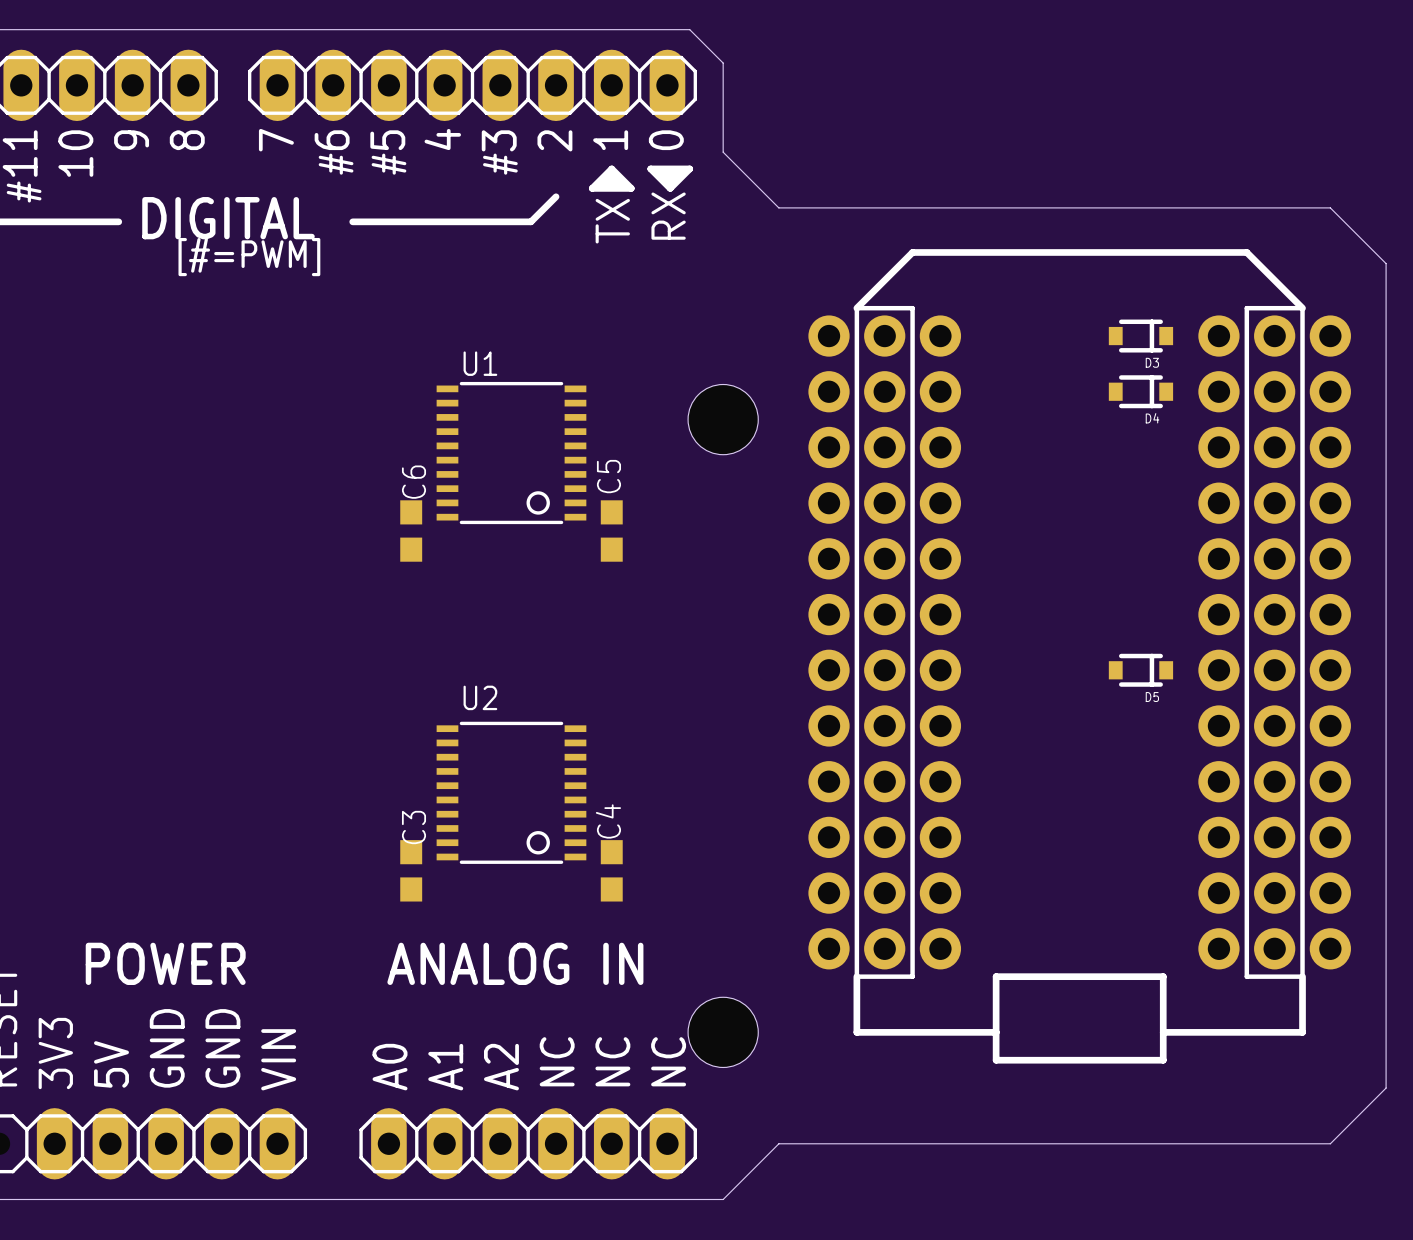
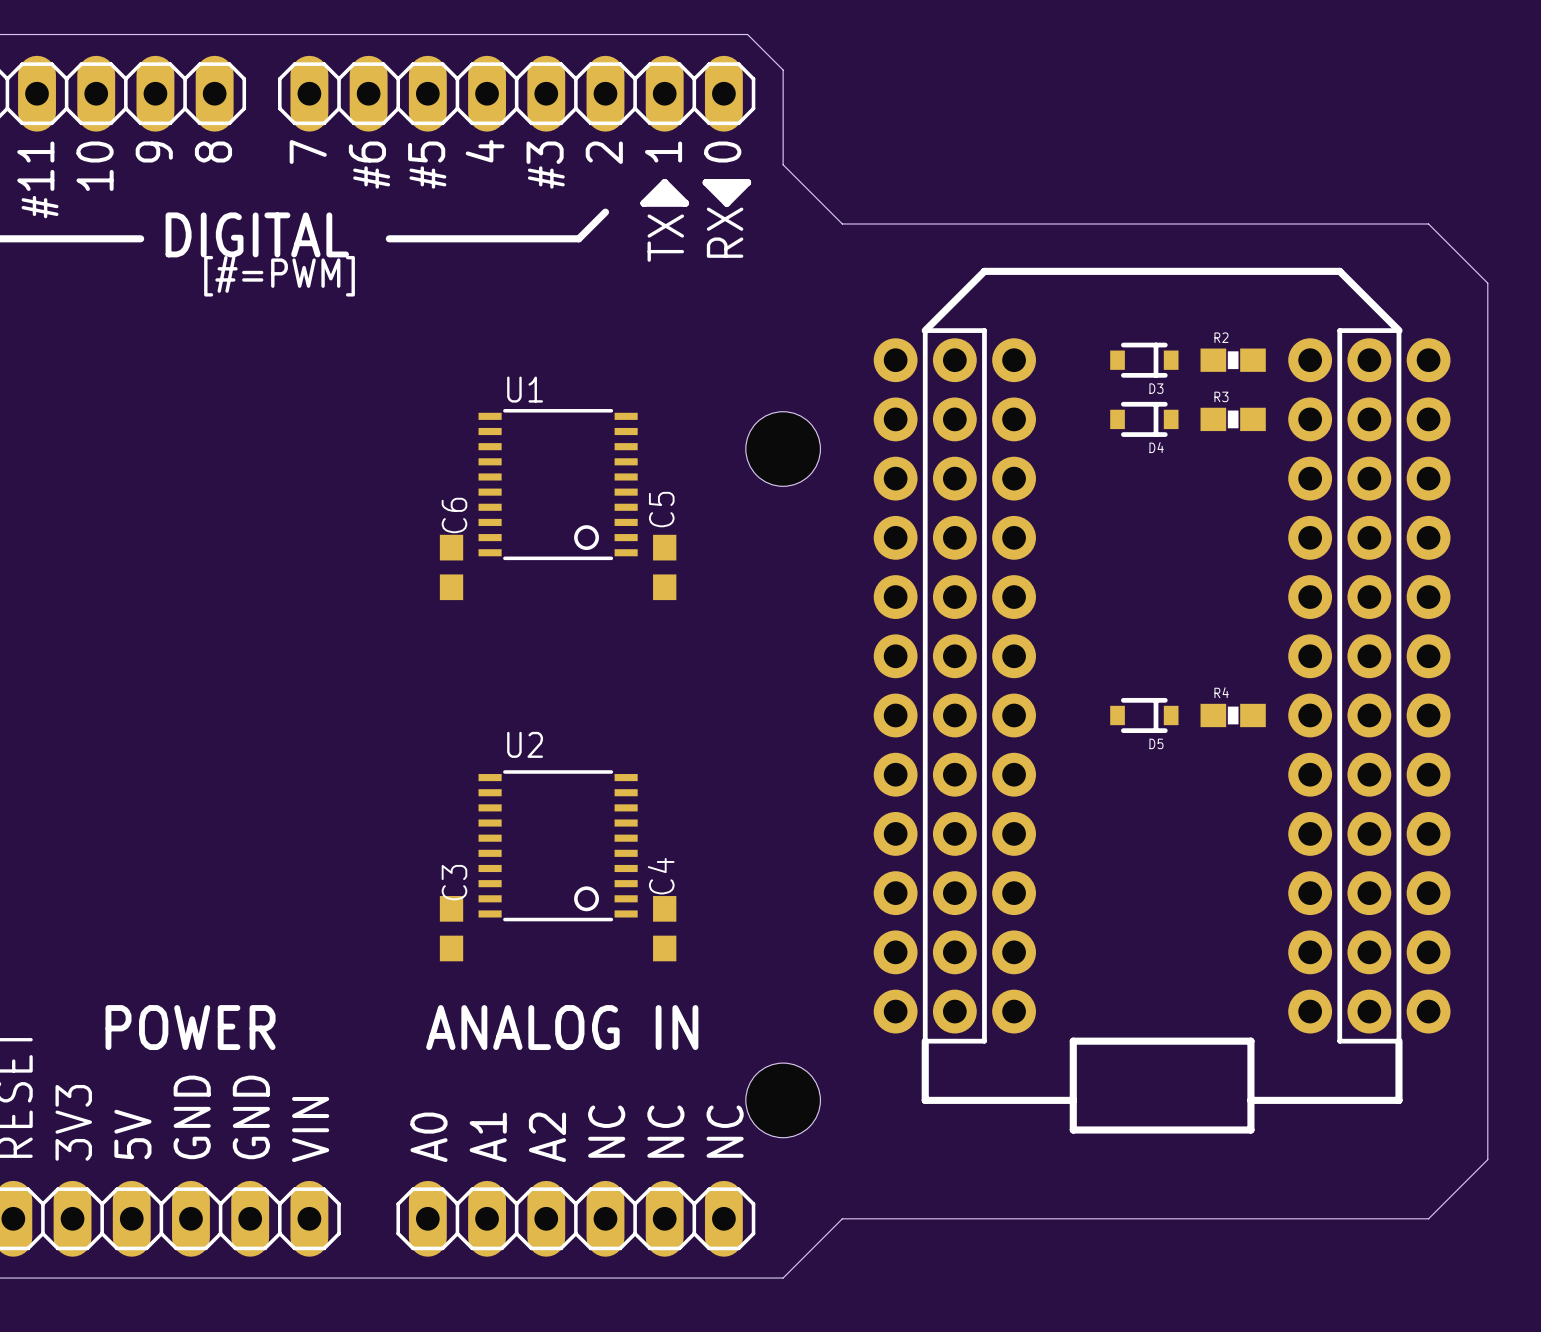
D3 position: (1140, 336) -> (1144, 360)
R2: none -> (1233, 360)
D4 position: (1140, 391) -> (1144, 419)
R3: none -> (1233, 419)
D5 position: (1140, 670) -> (1144, 715)
R4: none -> (1233, 715)

